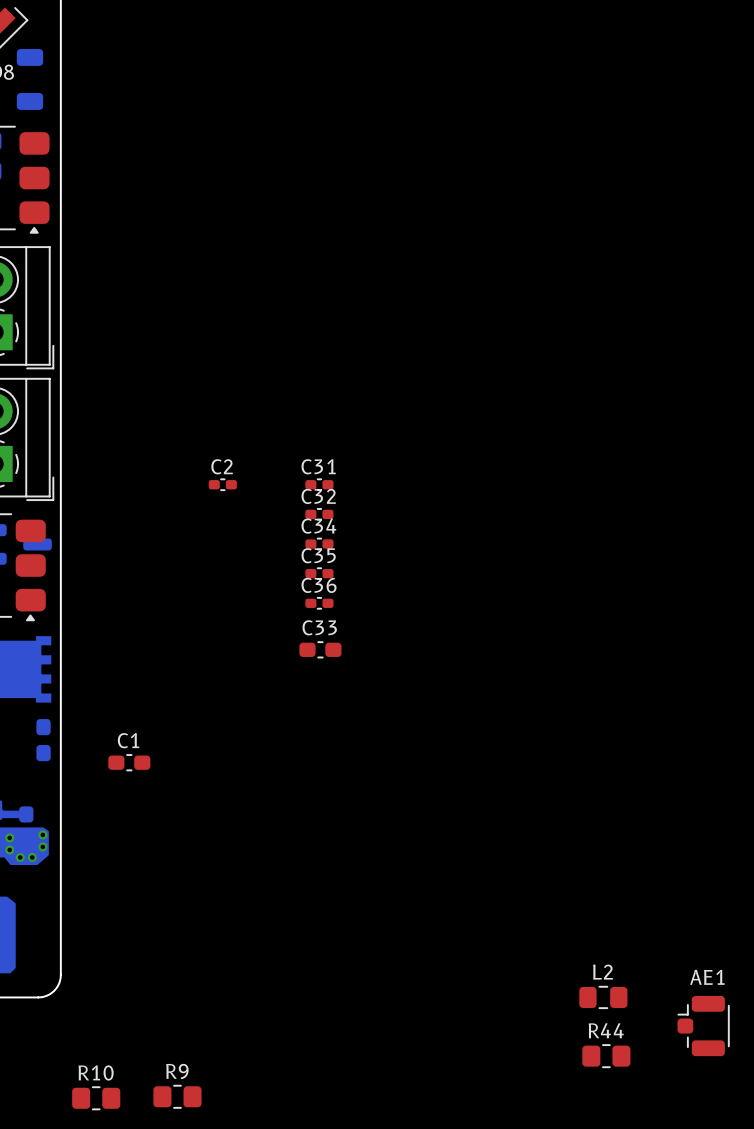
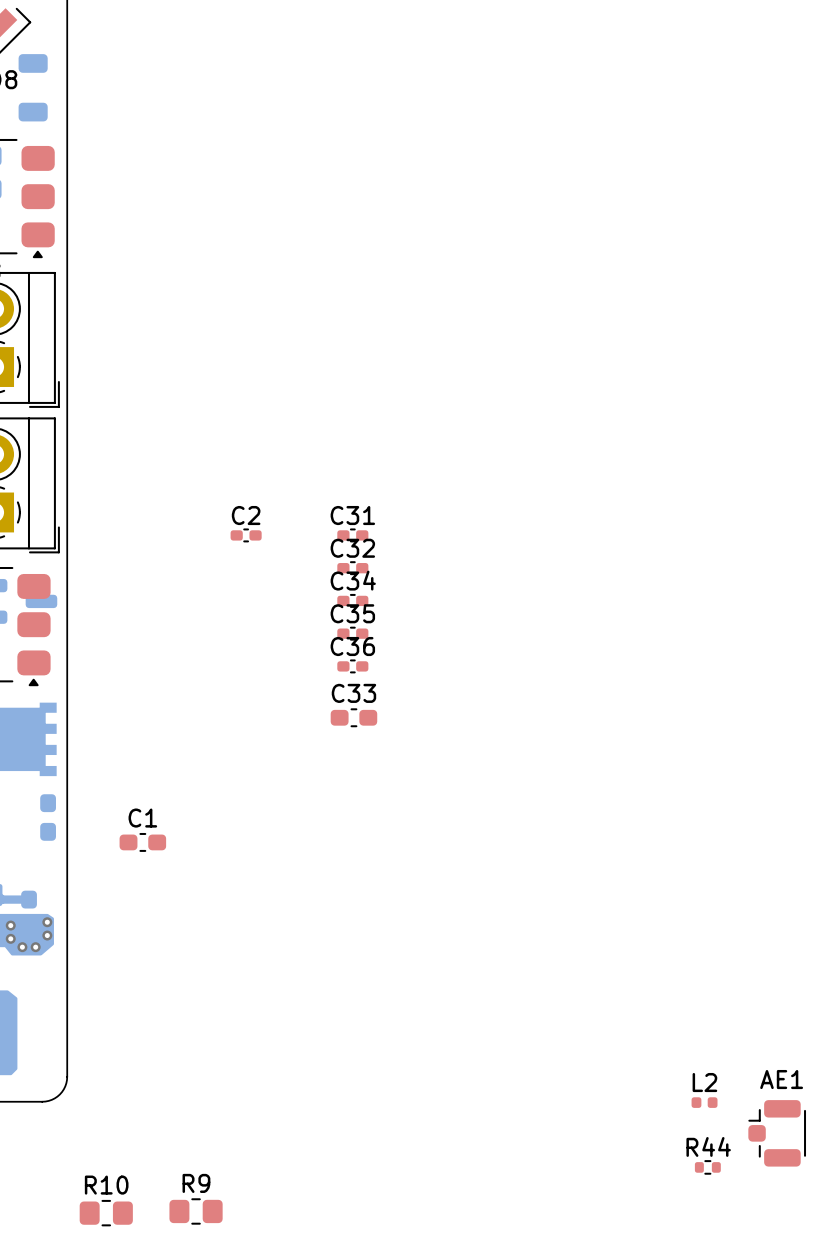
L2 footprint: [579, 985, 628, 1010] -> [691, 1097, 718, 1108]
R44 footprint: [582, 1044, 631, 1069] -> [694, 1160, 721, 1175]

